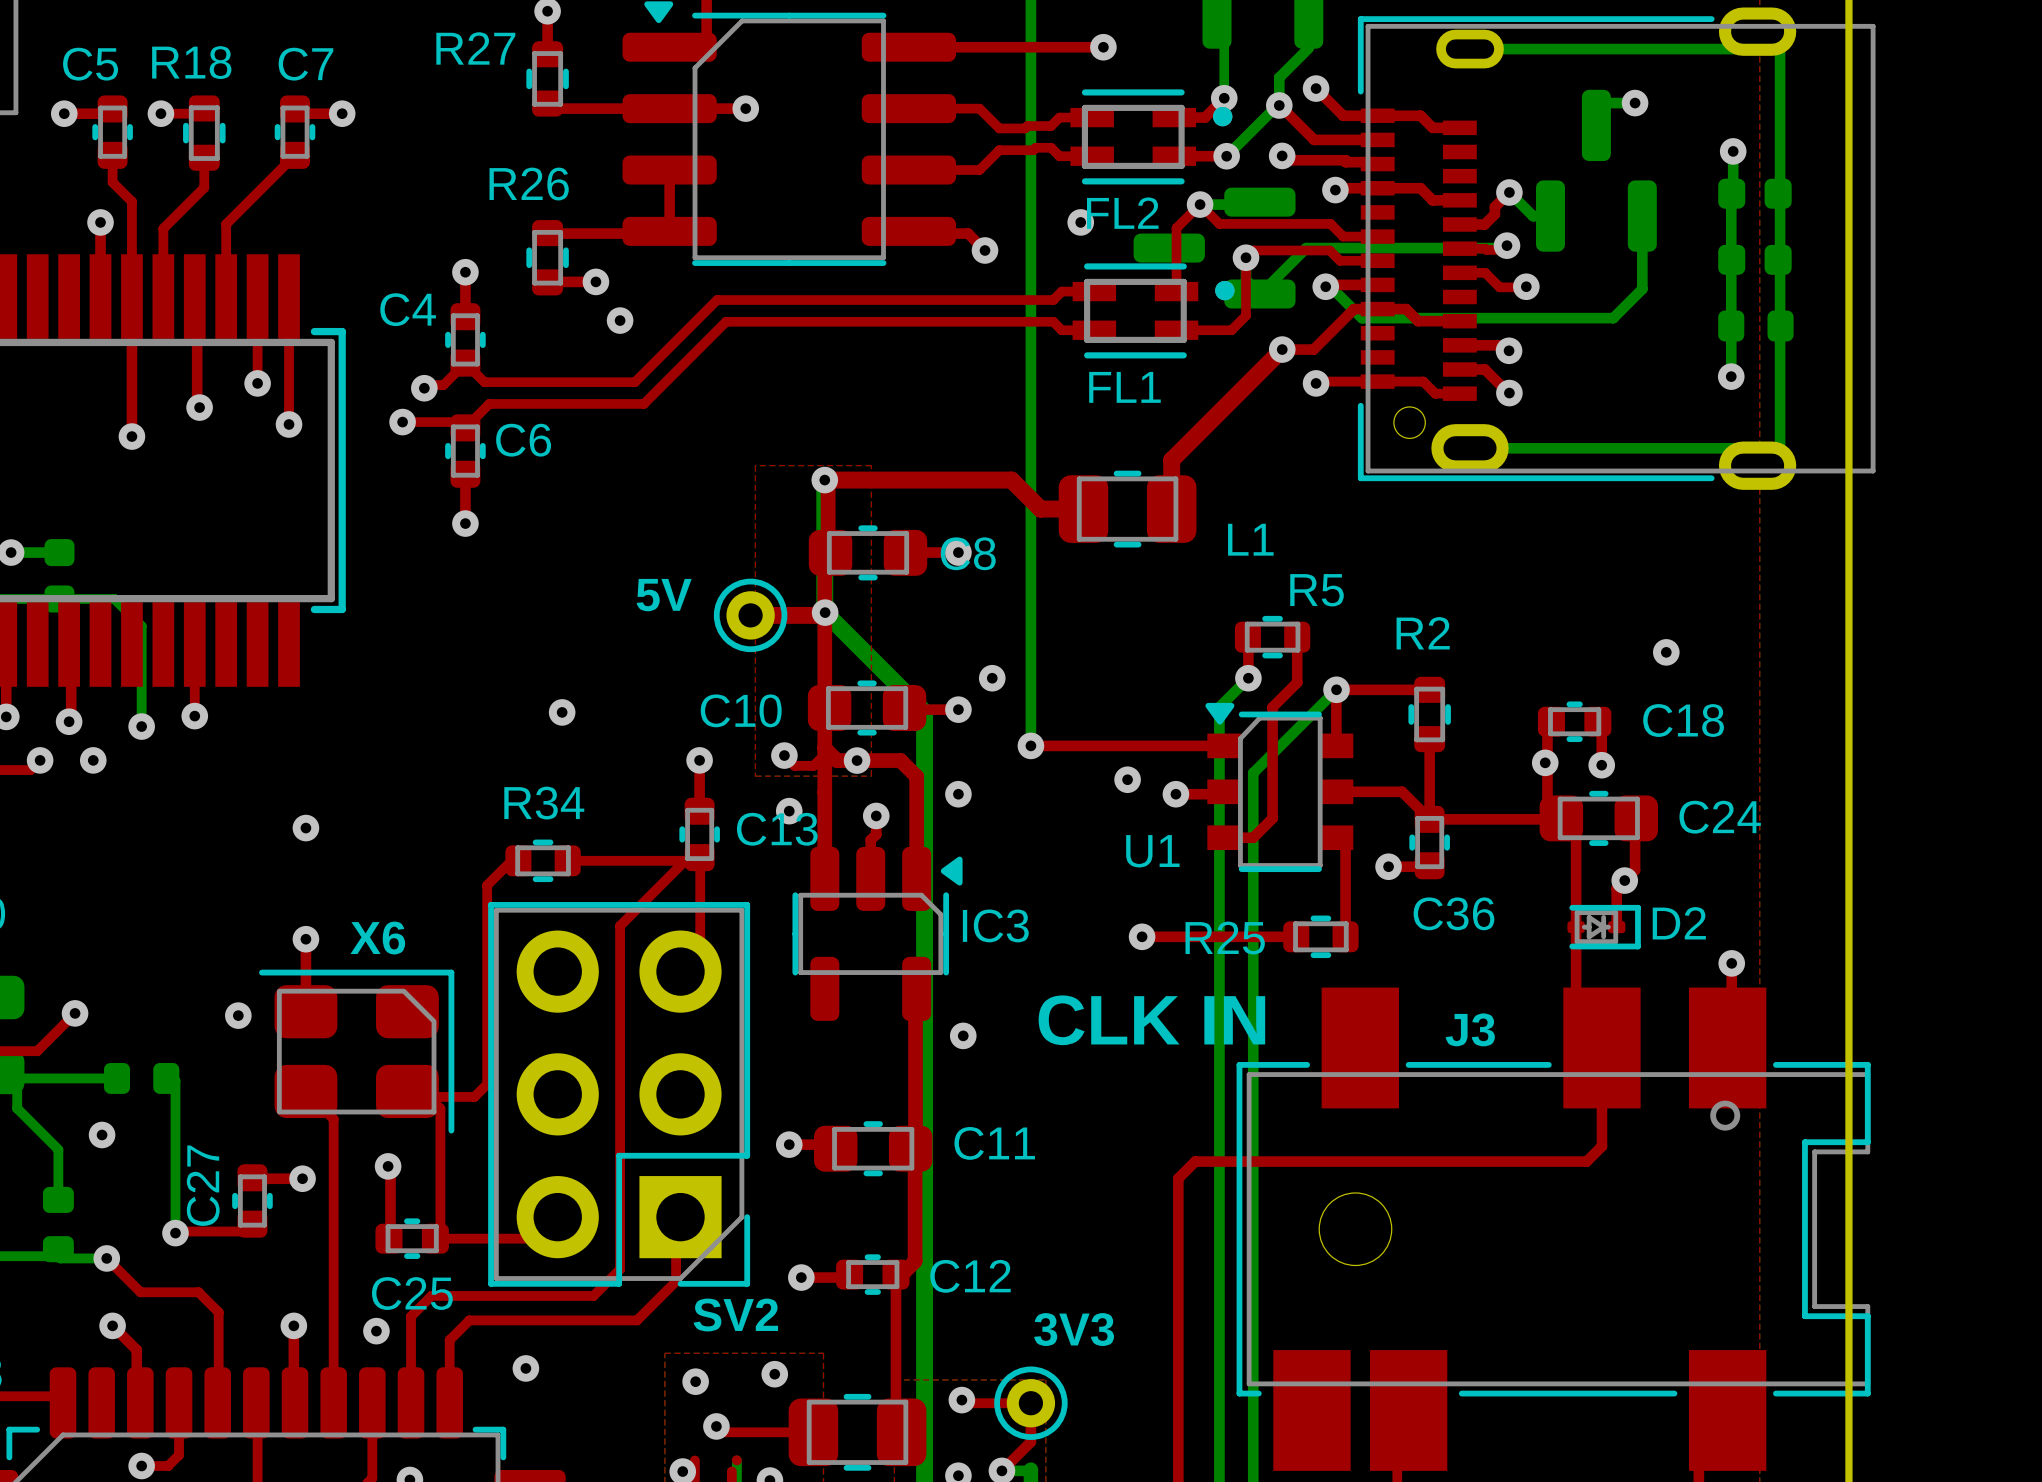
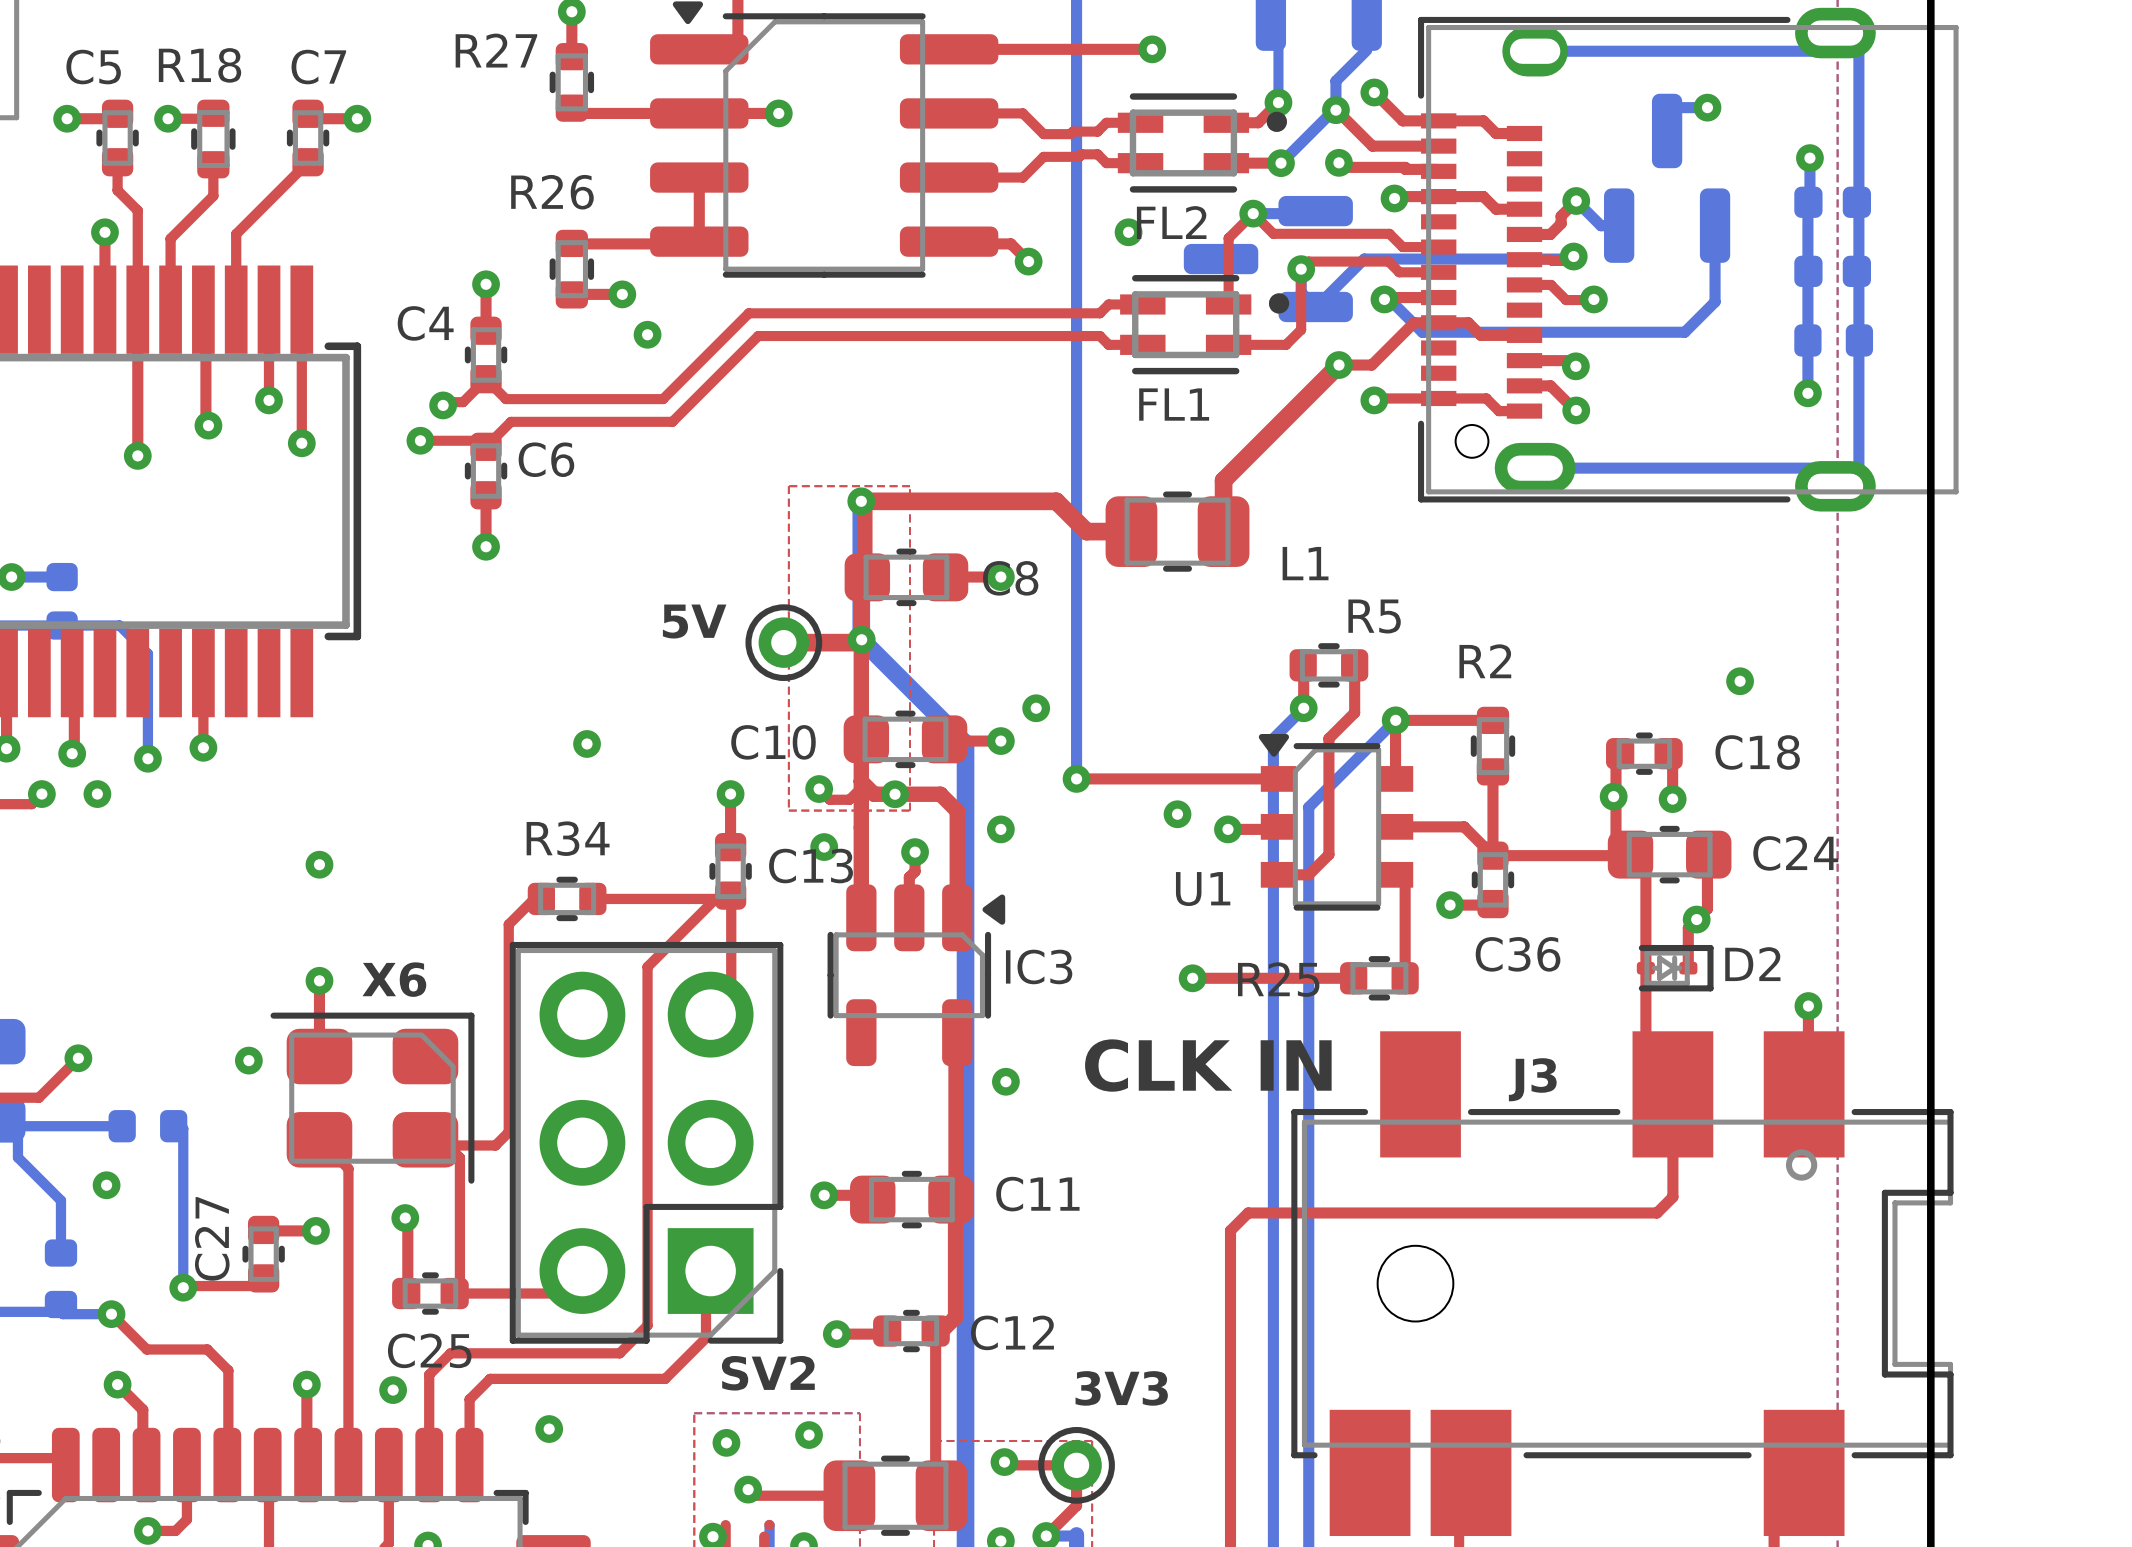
part footprint: [1357, 7, 1876, 490] -> [1418, 7, 1959, 512]

